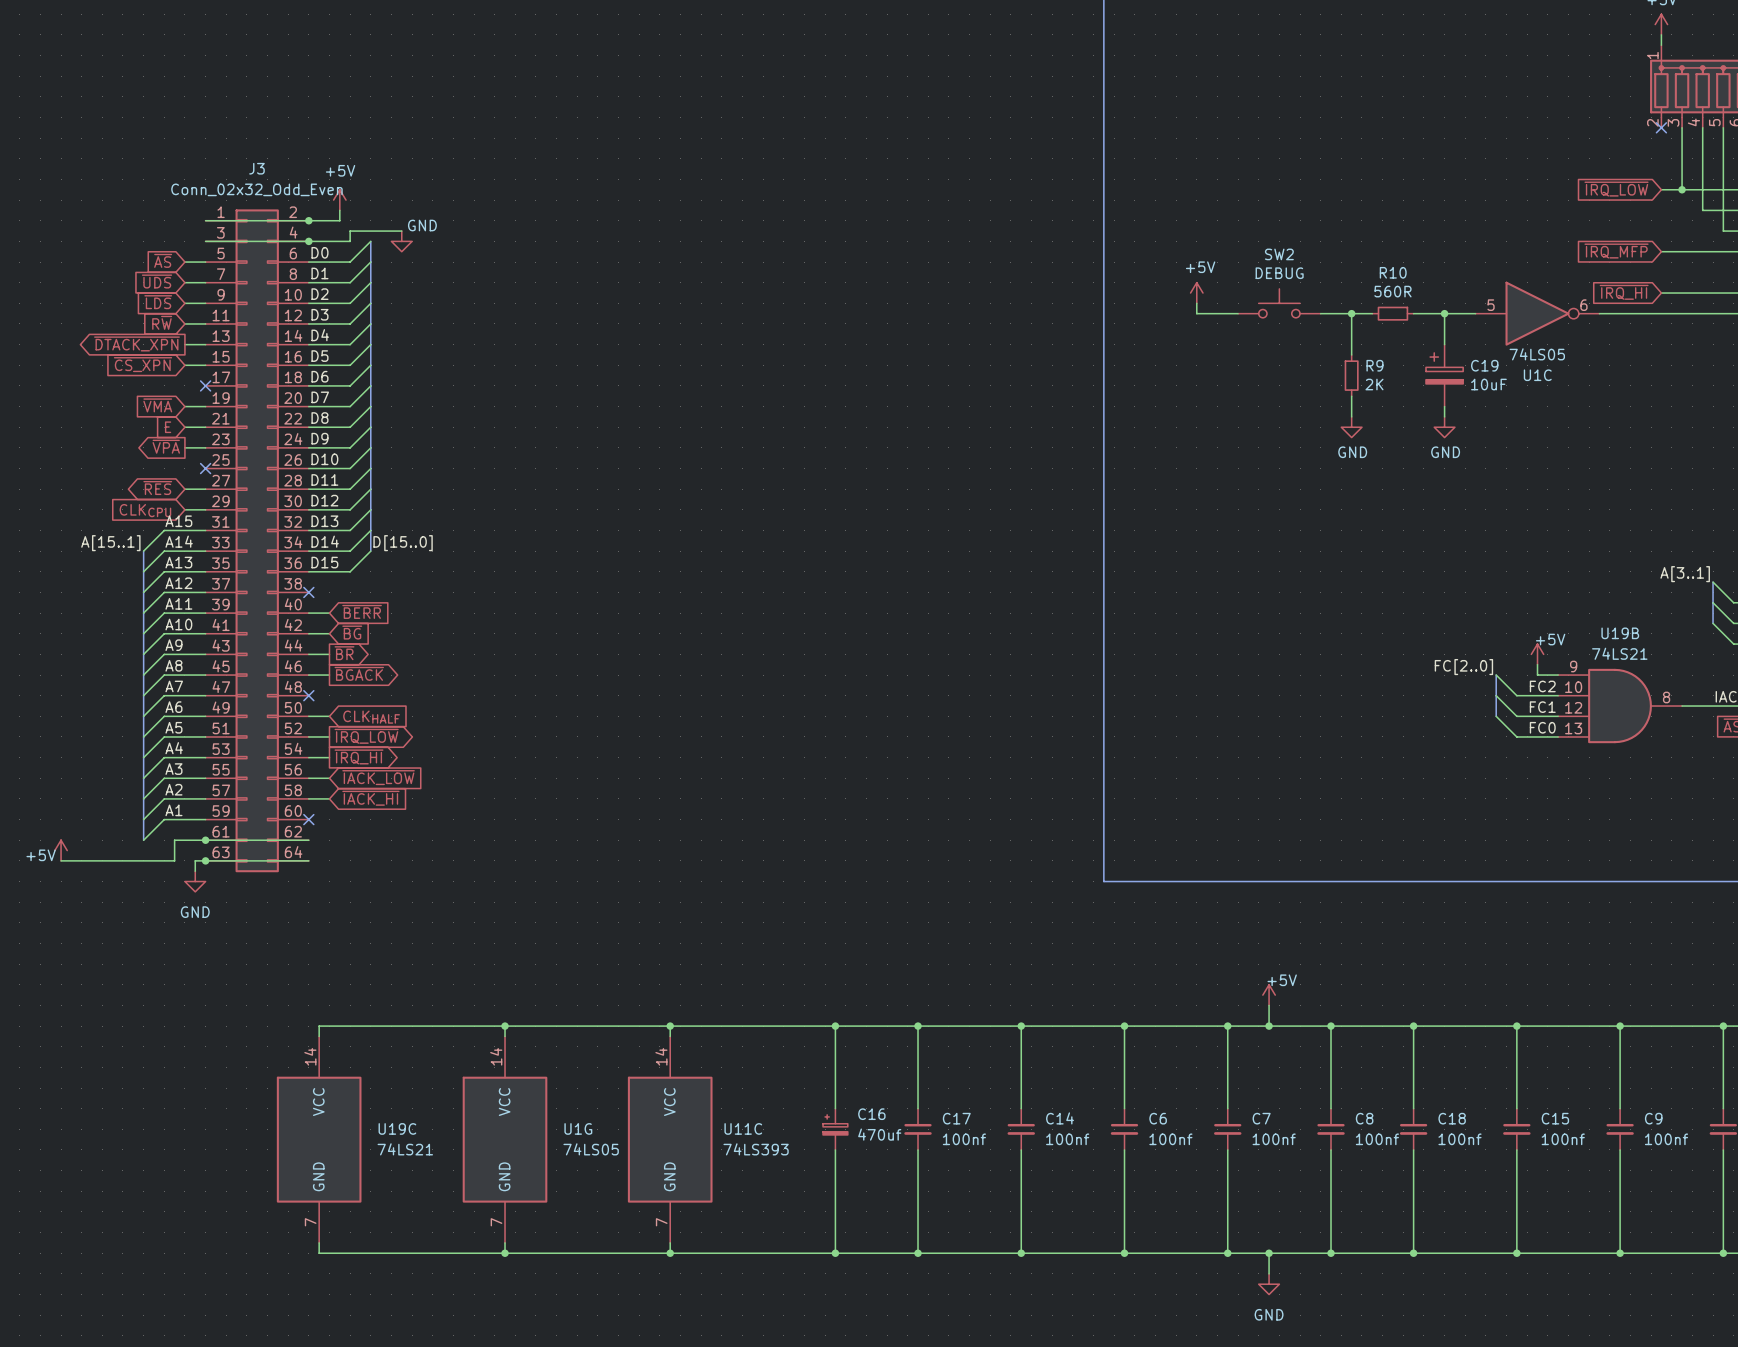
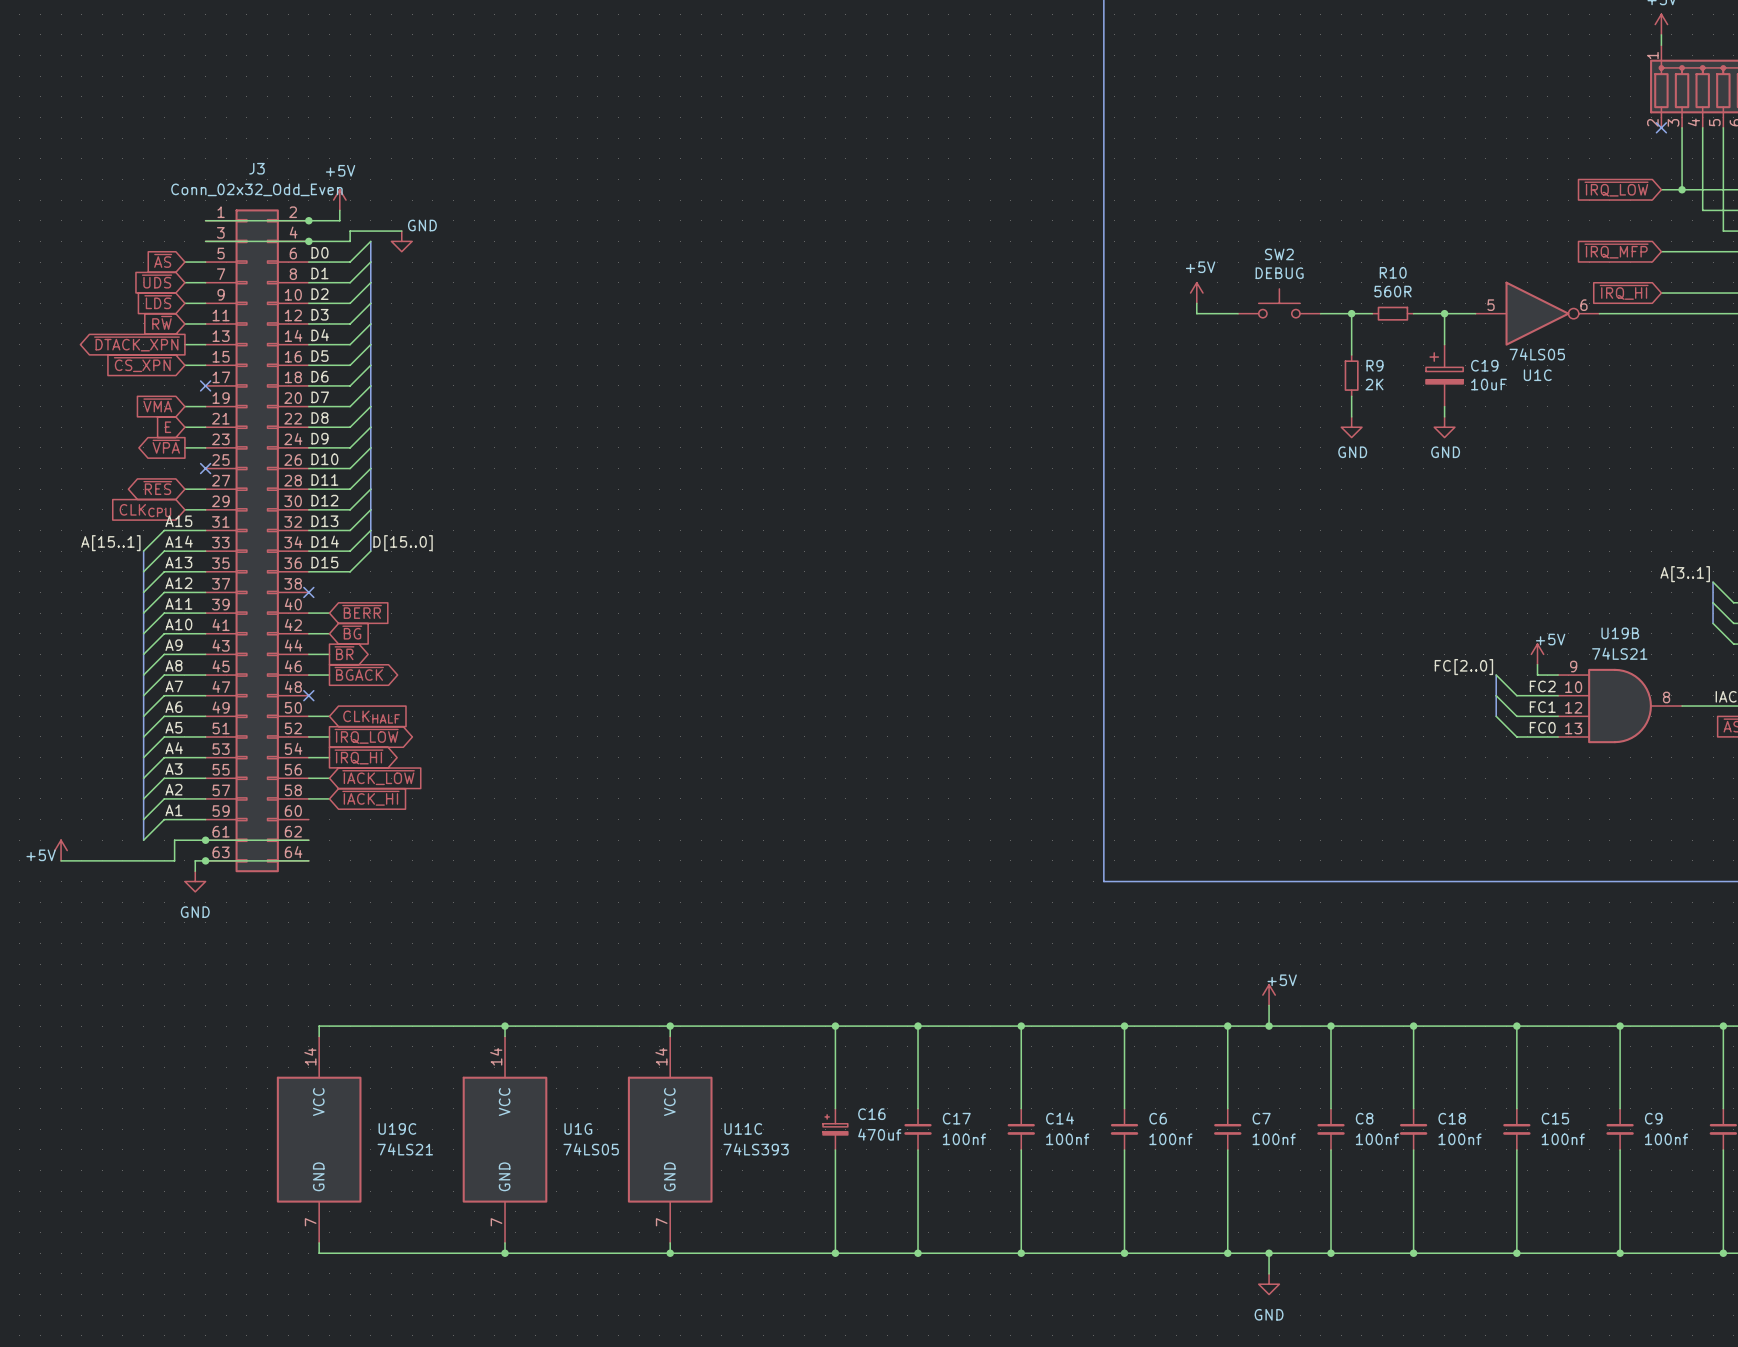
no-connect mark: (308, 819) -> none

